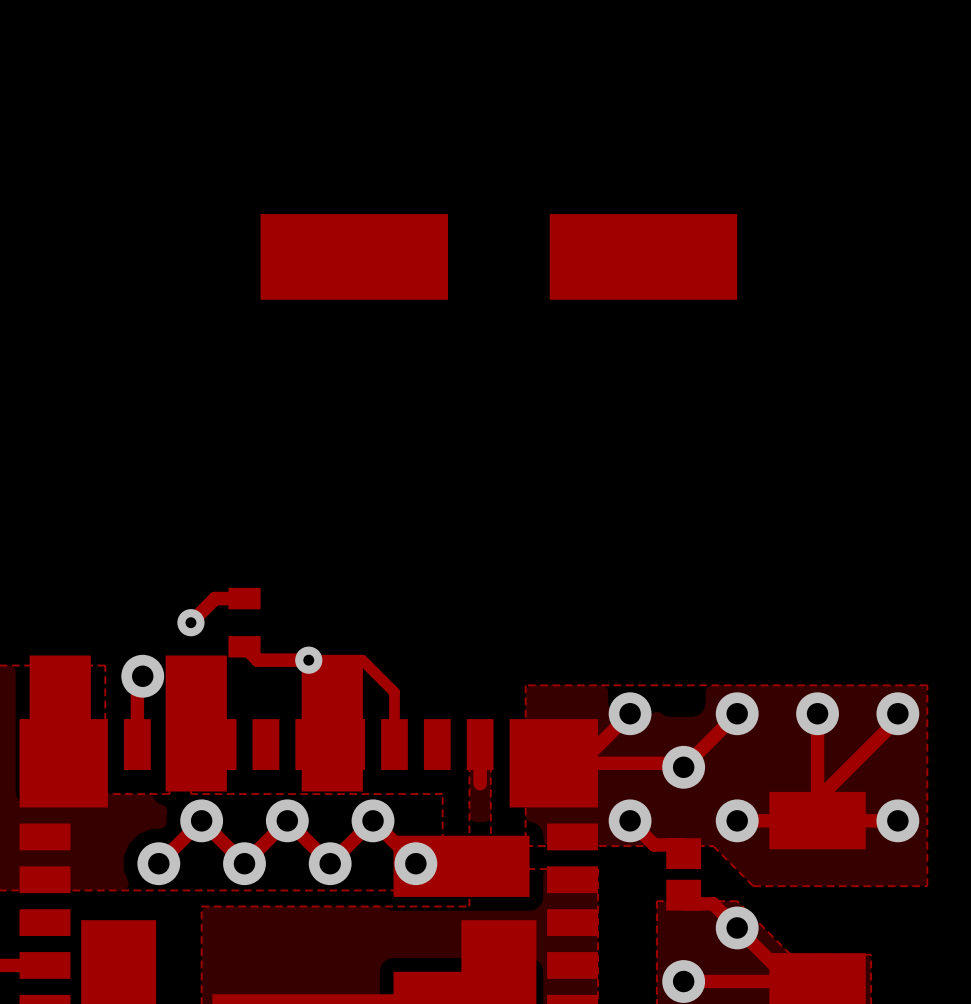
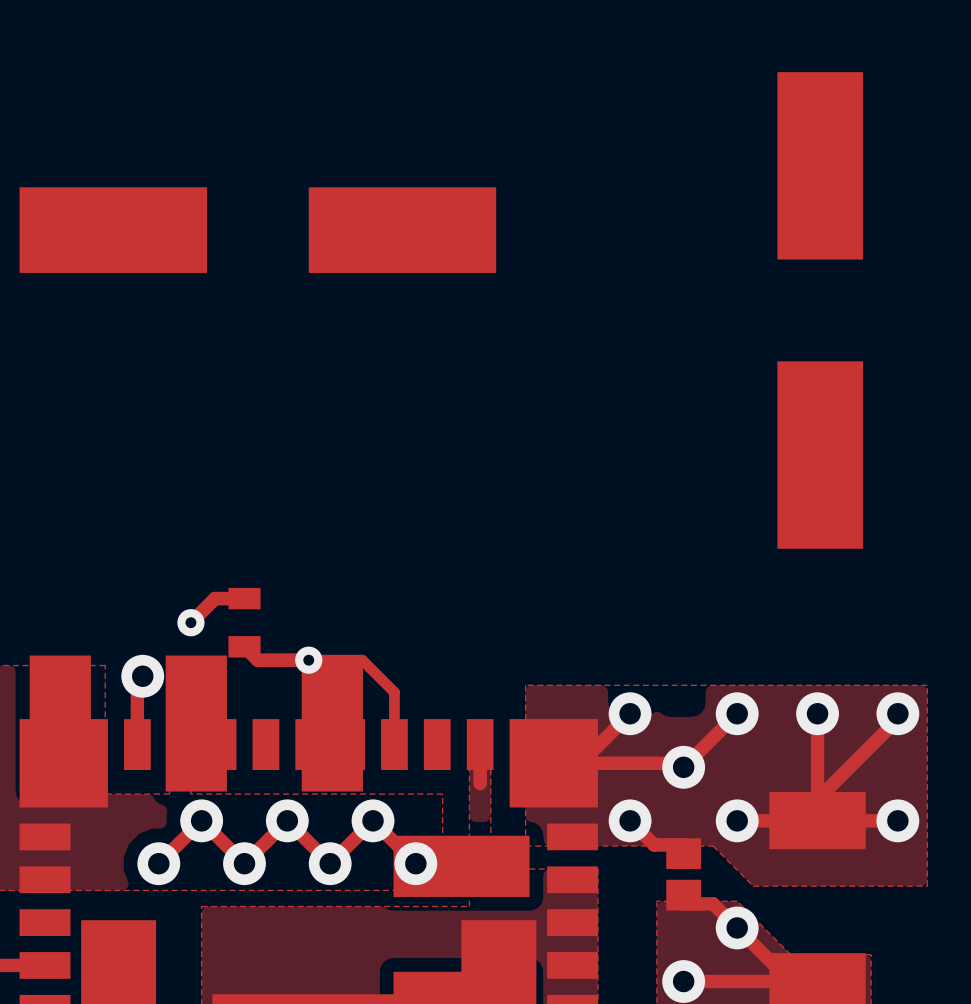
part: none -> (257, 230)
part: (498, 256) -> none
part: none -> (820, 310)

